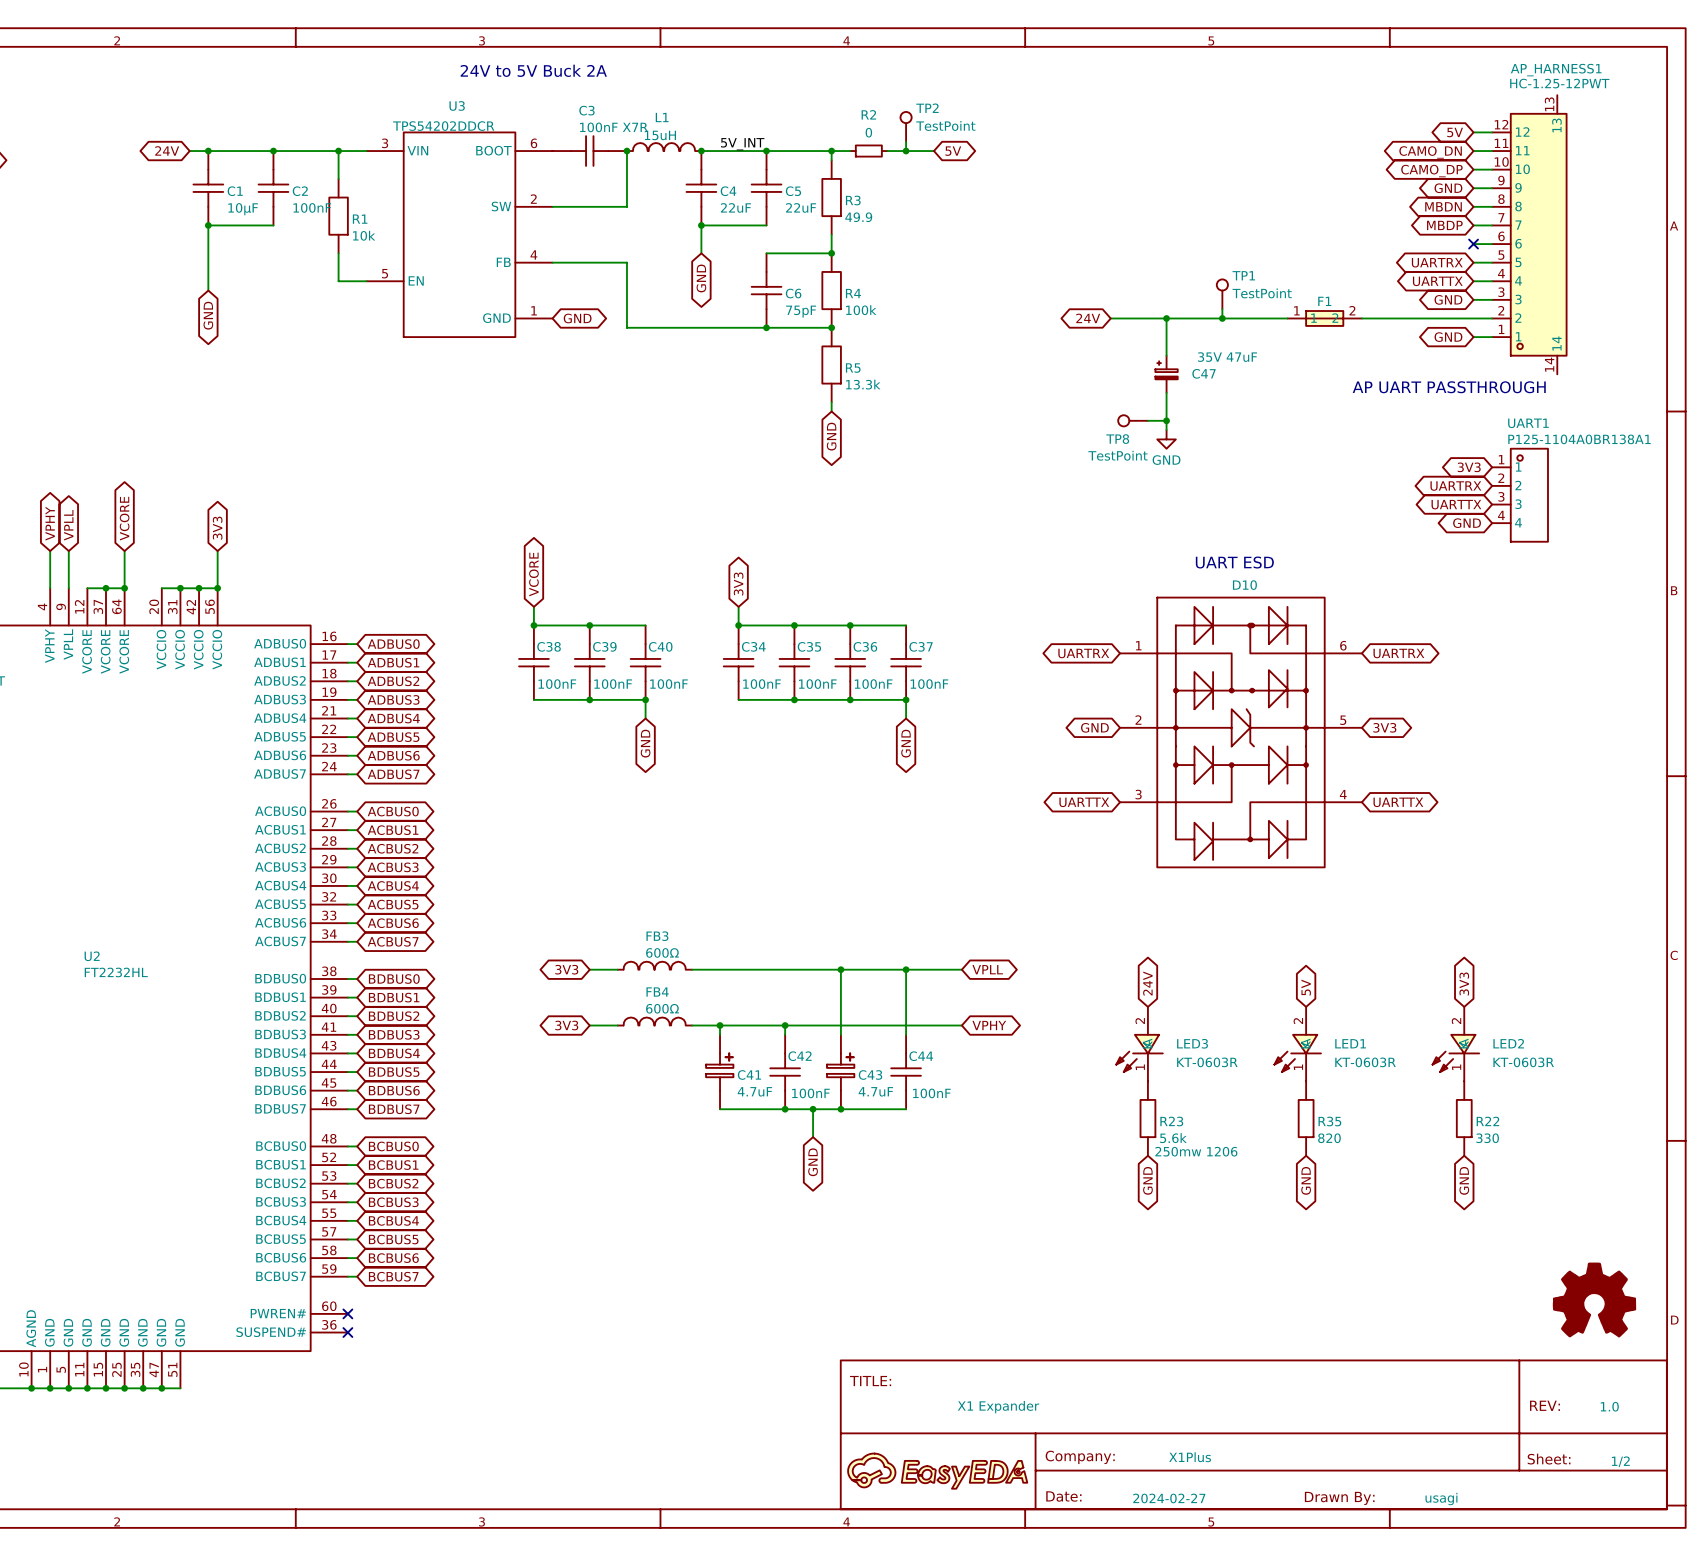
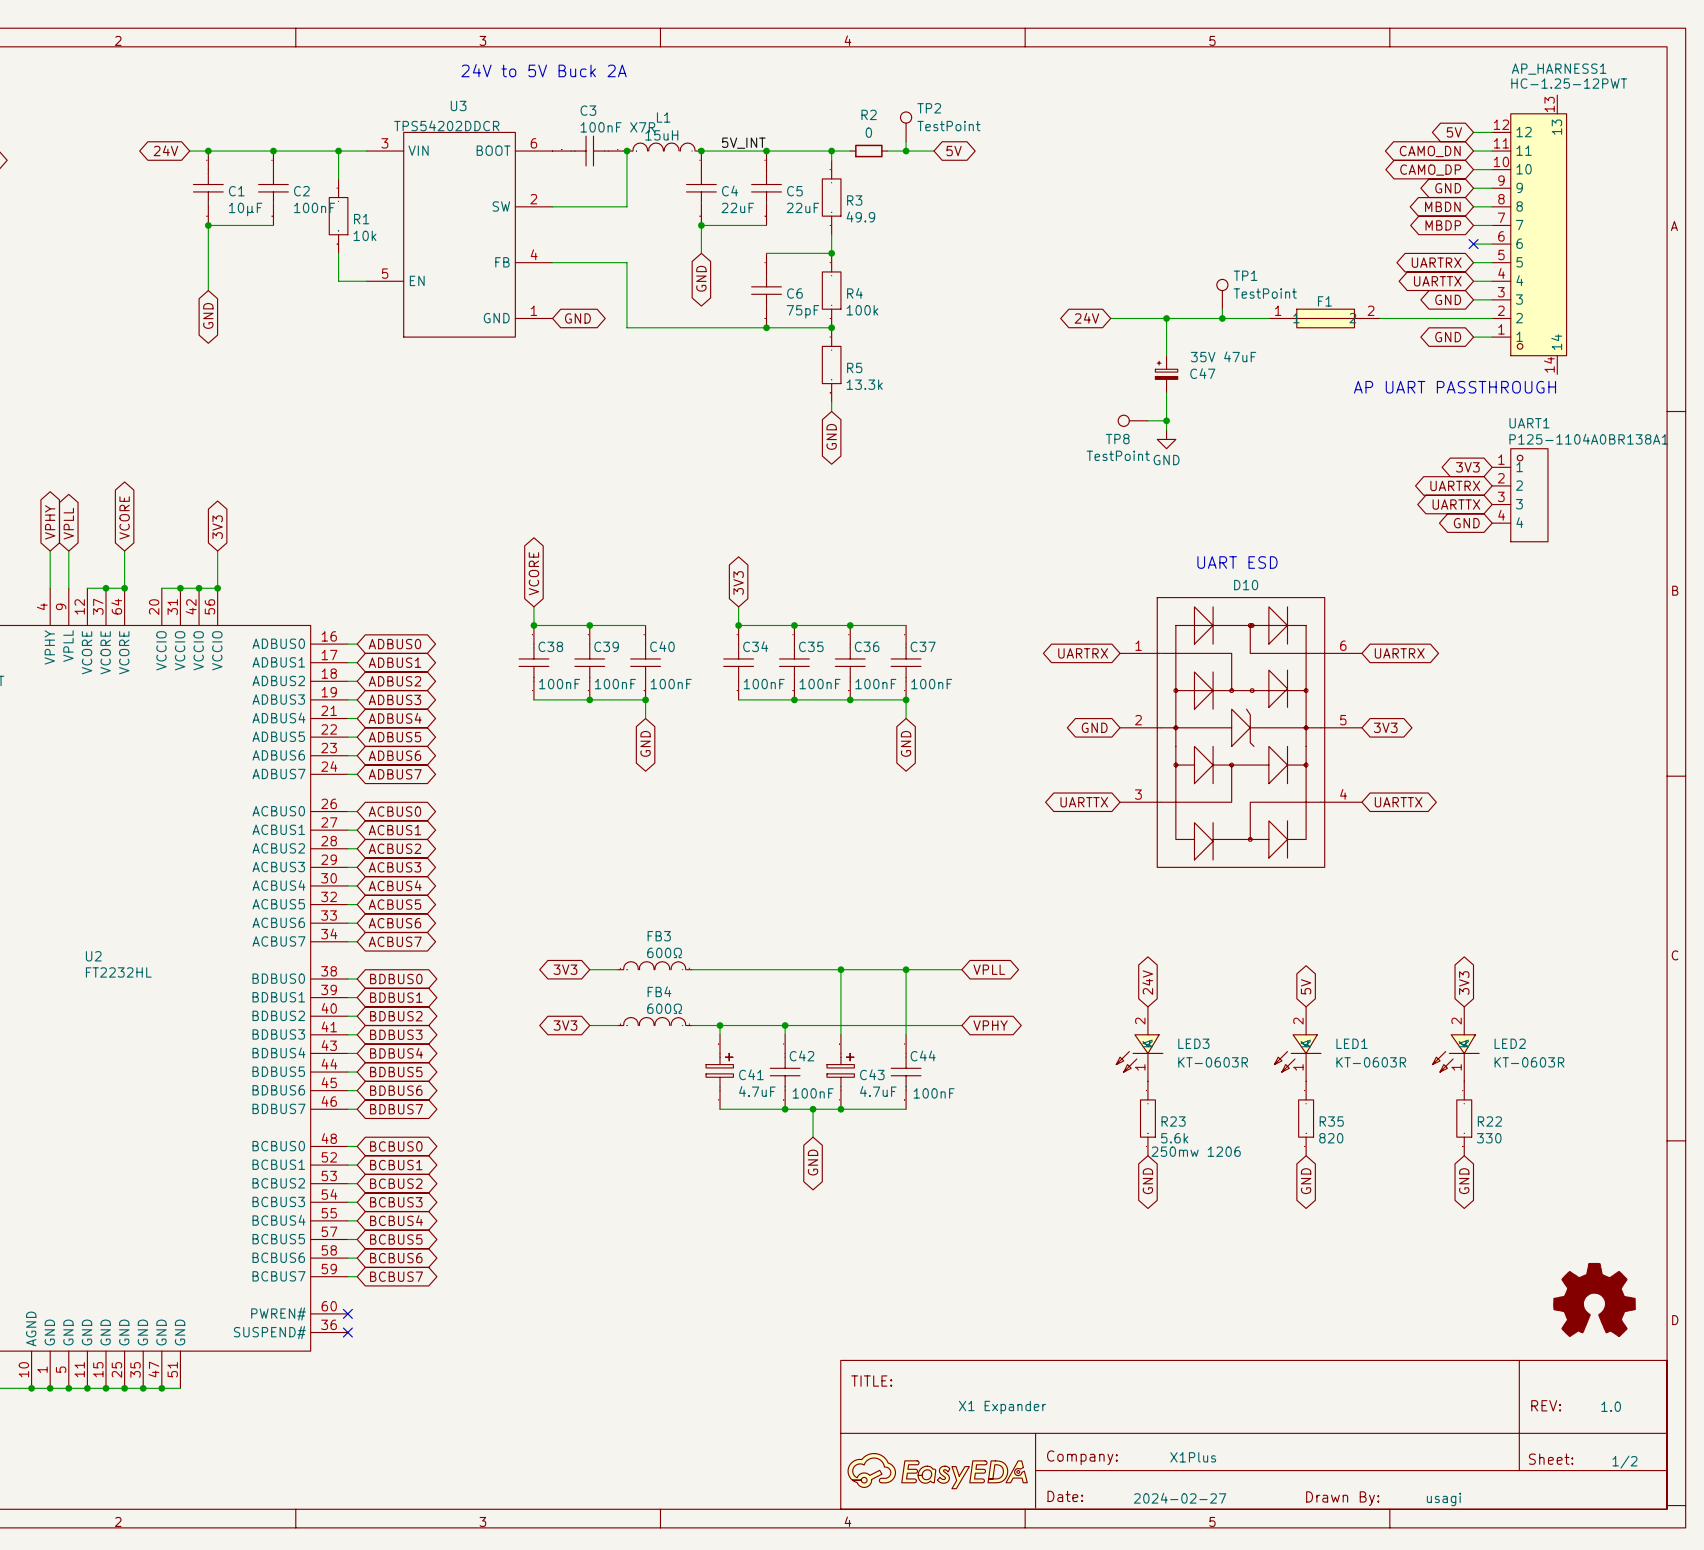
F1 symbol: [1287, 311, 1362, 326] -> [1268, 309, 1381, 328]

